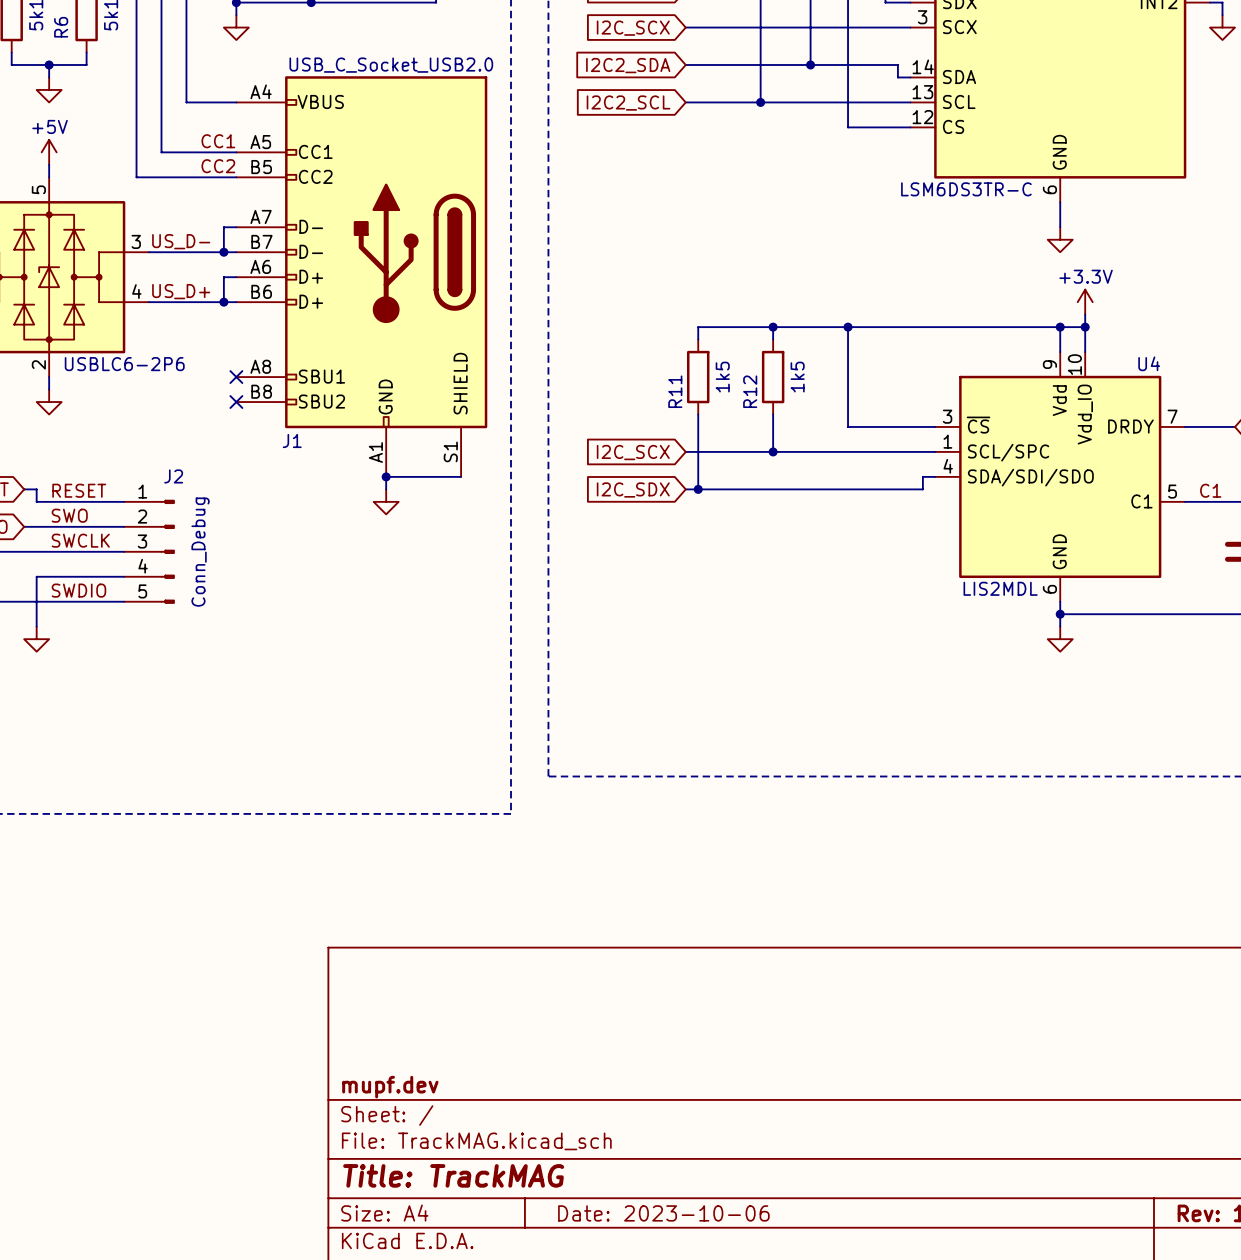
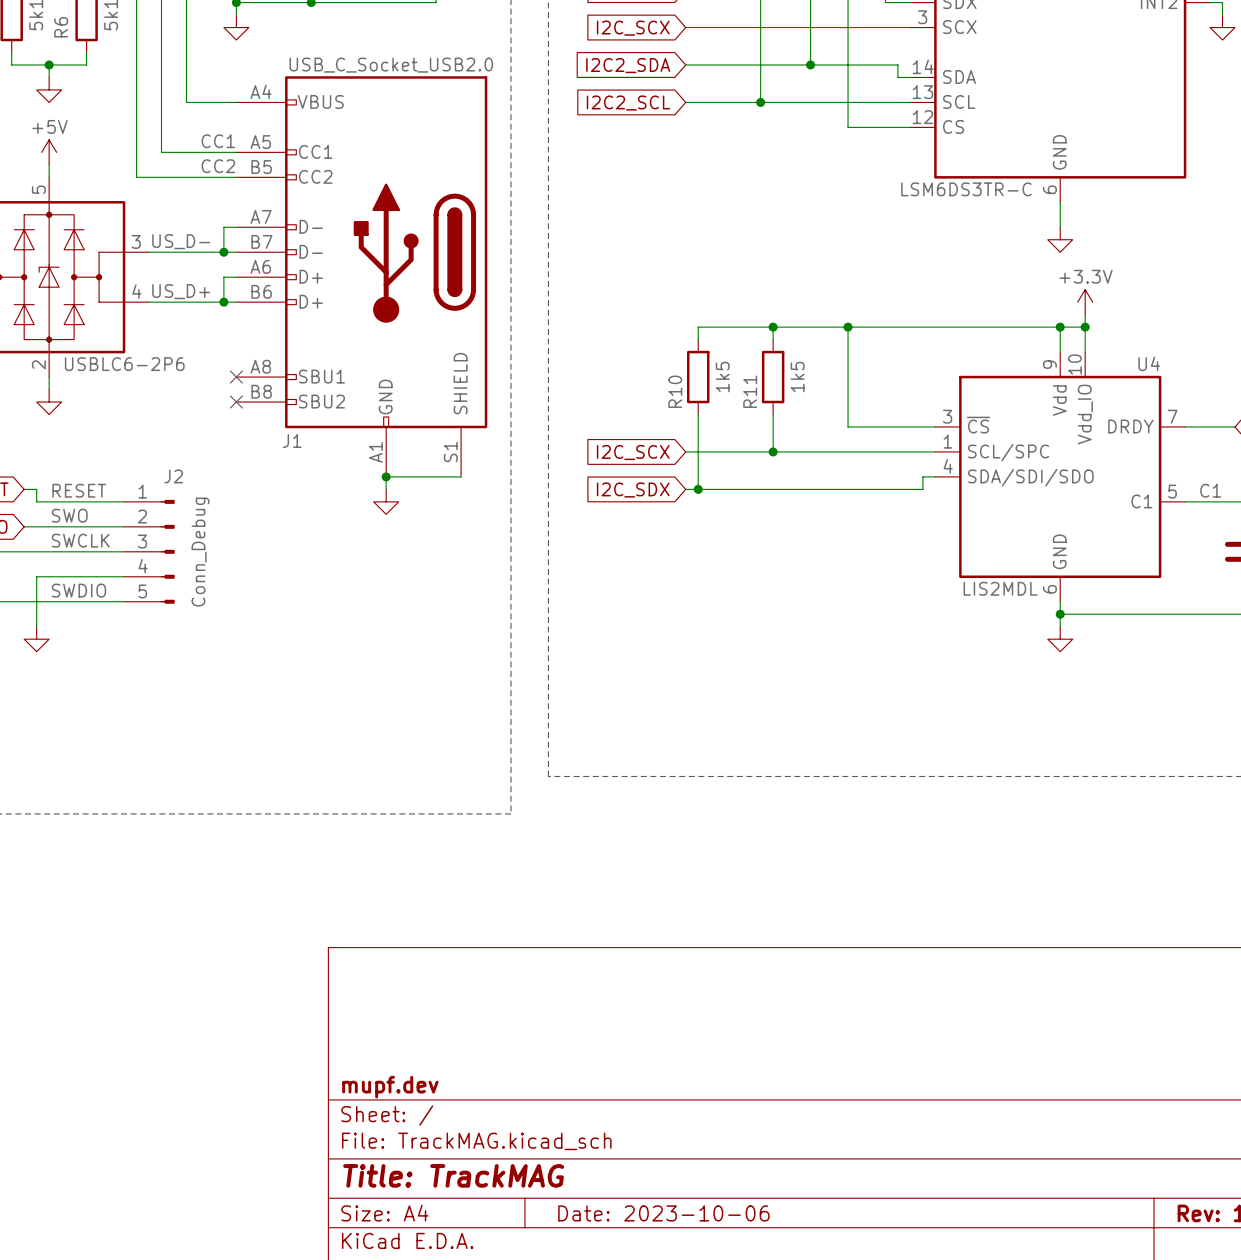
R11 name: R11 (675, 391) -> R10 (675, 391)
R12 name: R12 (750, 391) -> R11 (750, 391)

